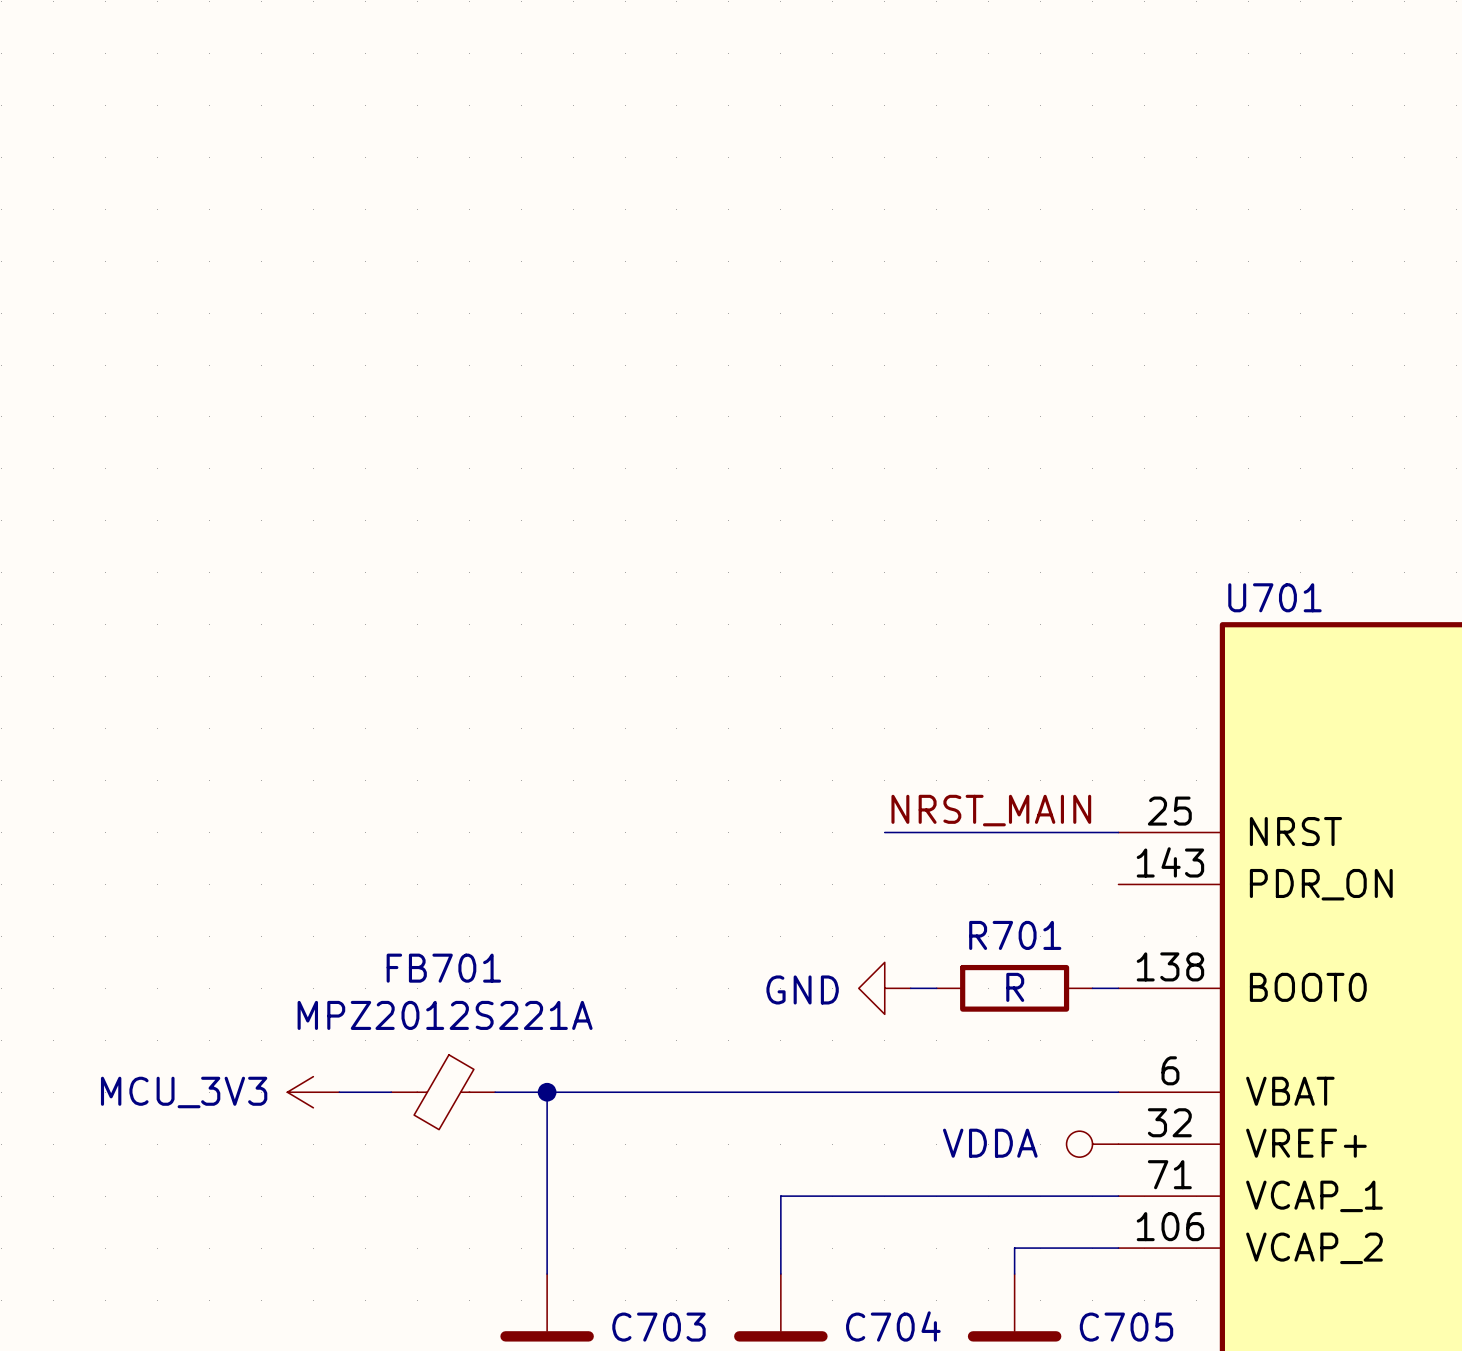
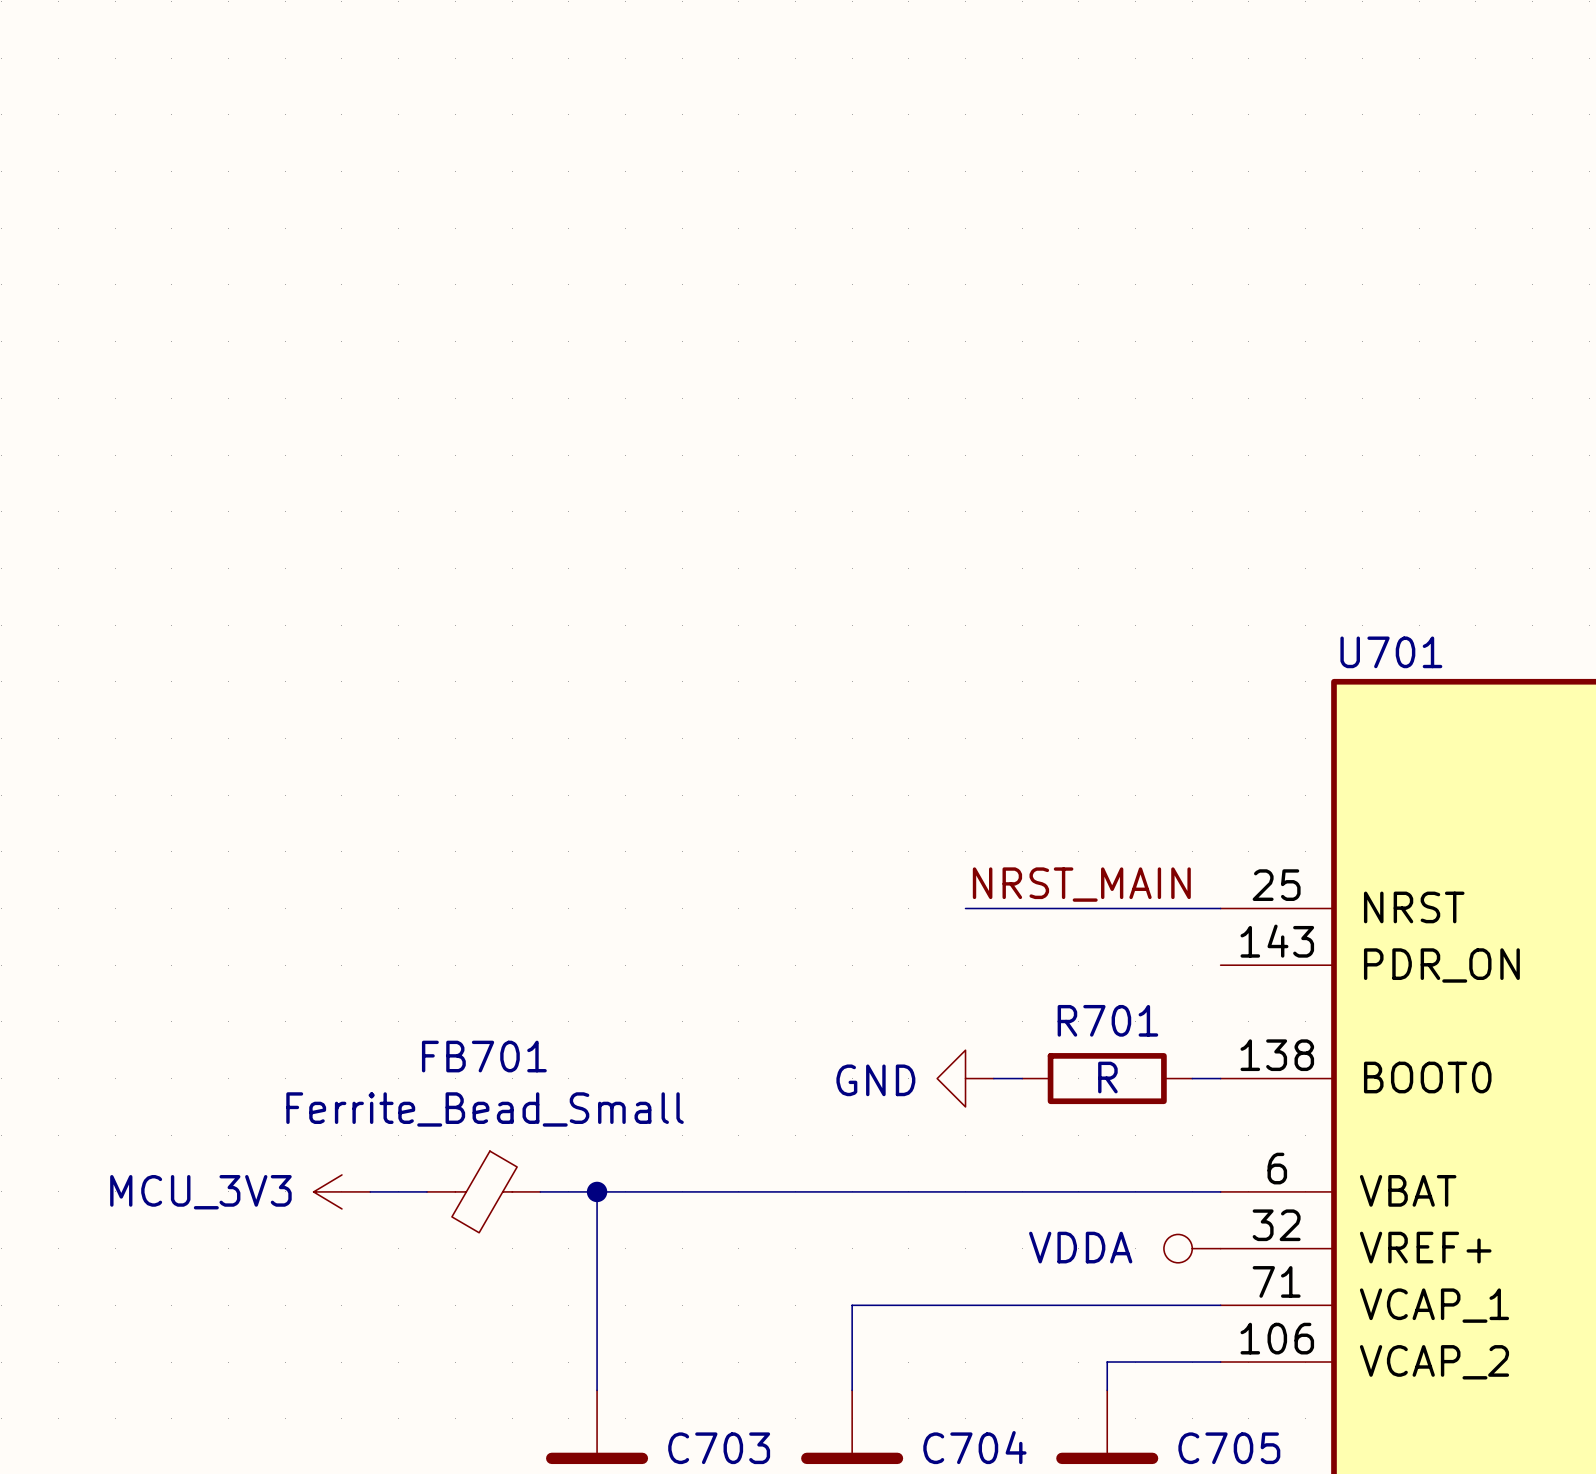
FB701 value: MPZ2012S221A (445, 1015) -> Ferrite_Bead_Small (485, 1109)

